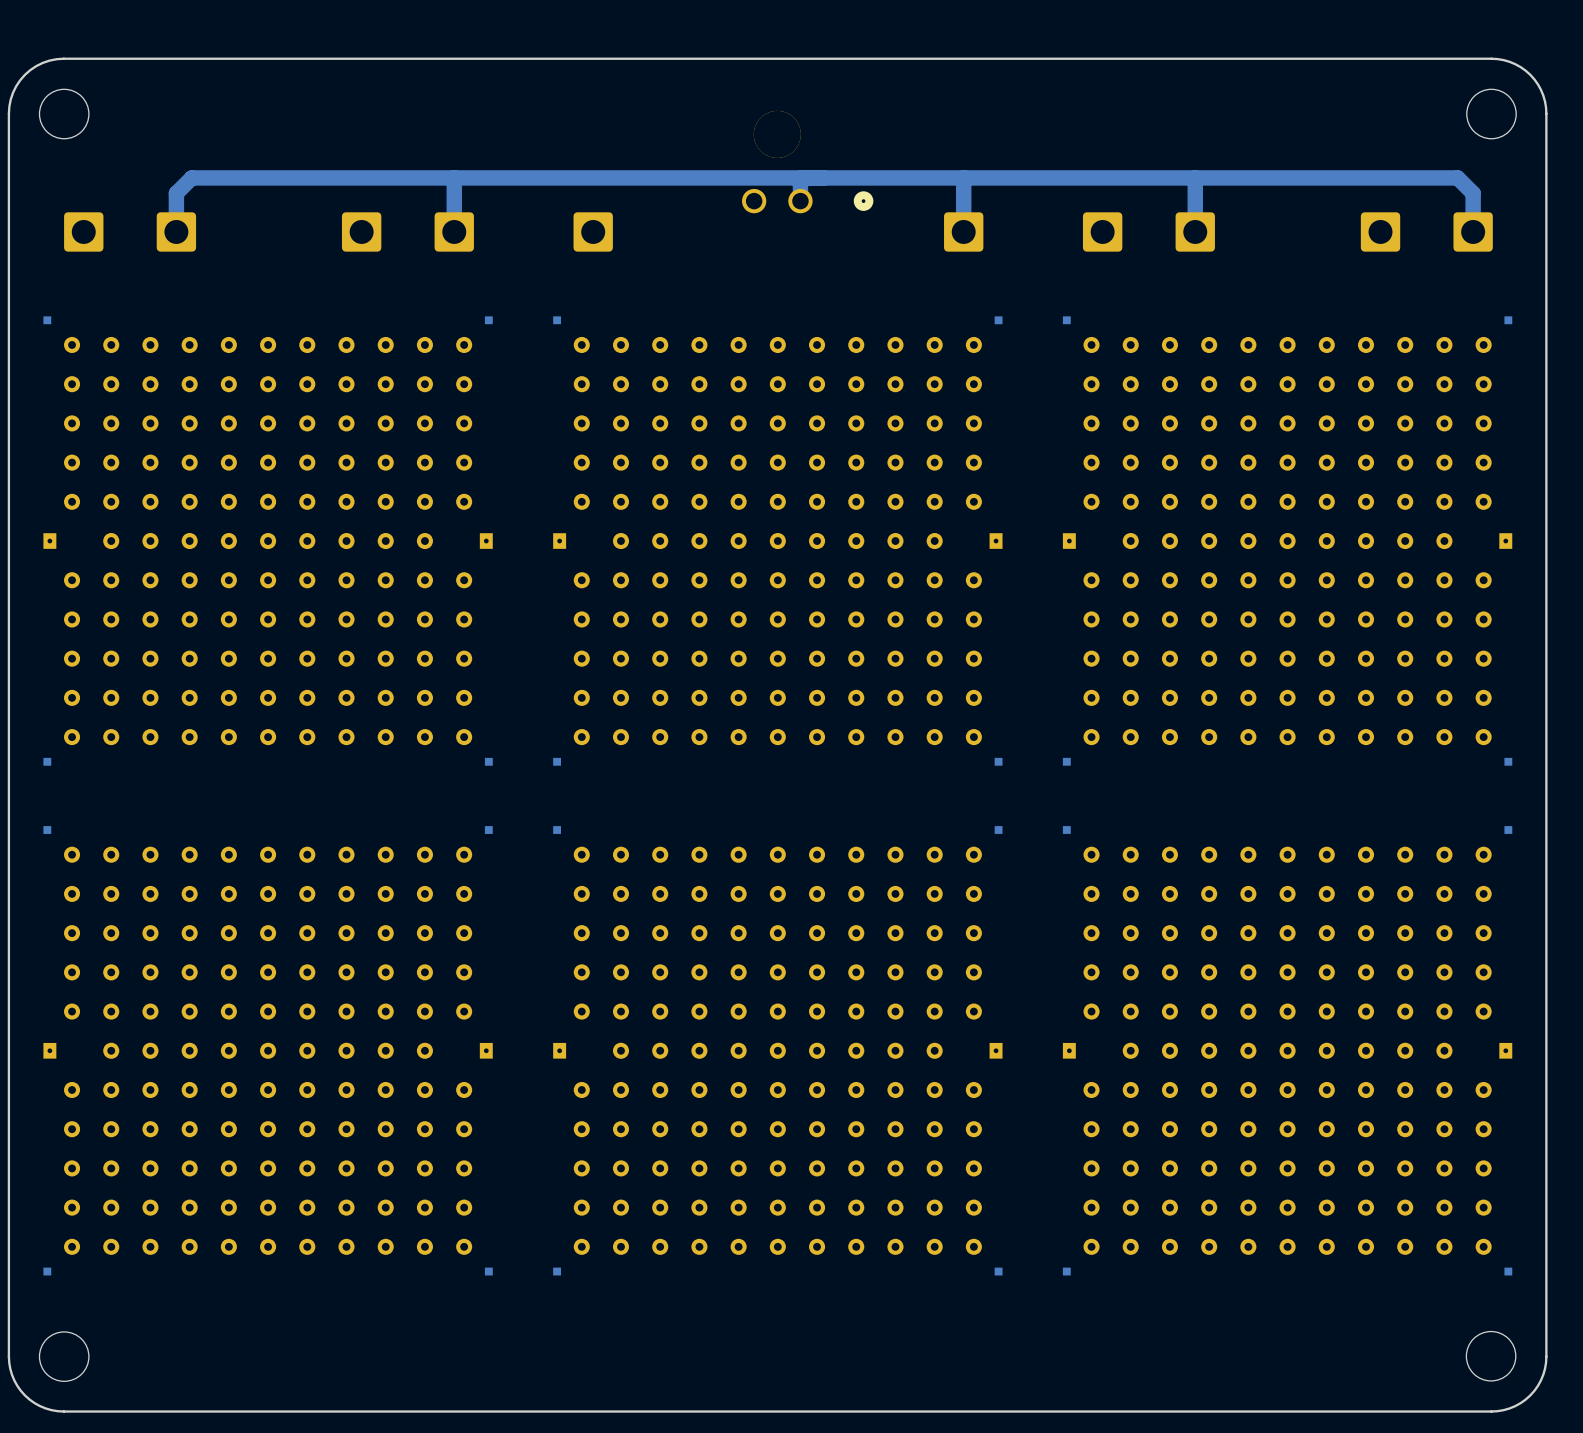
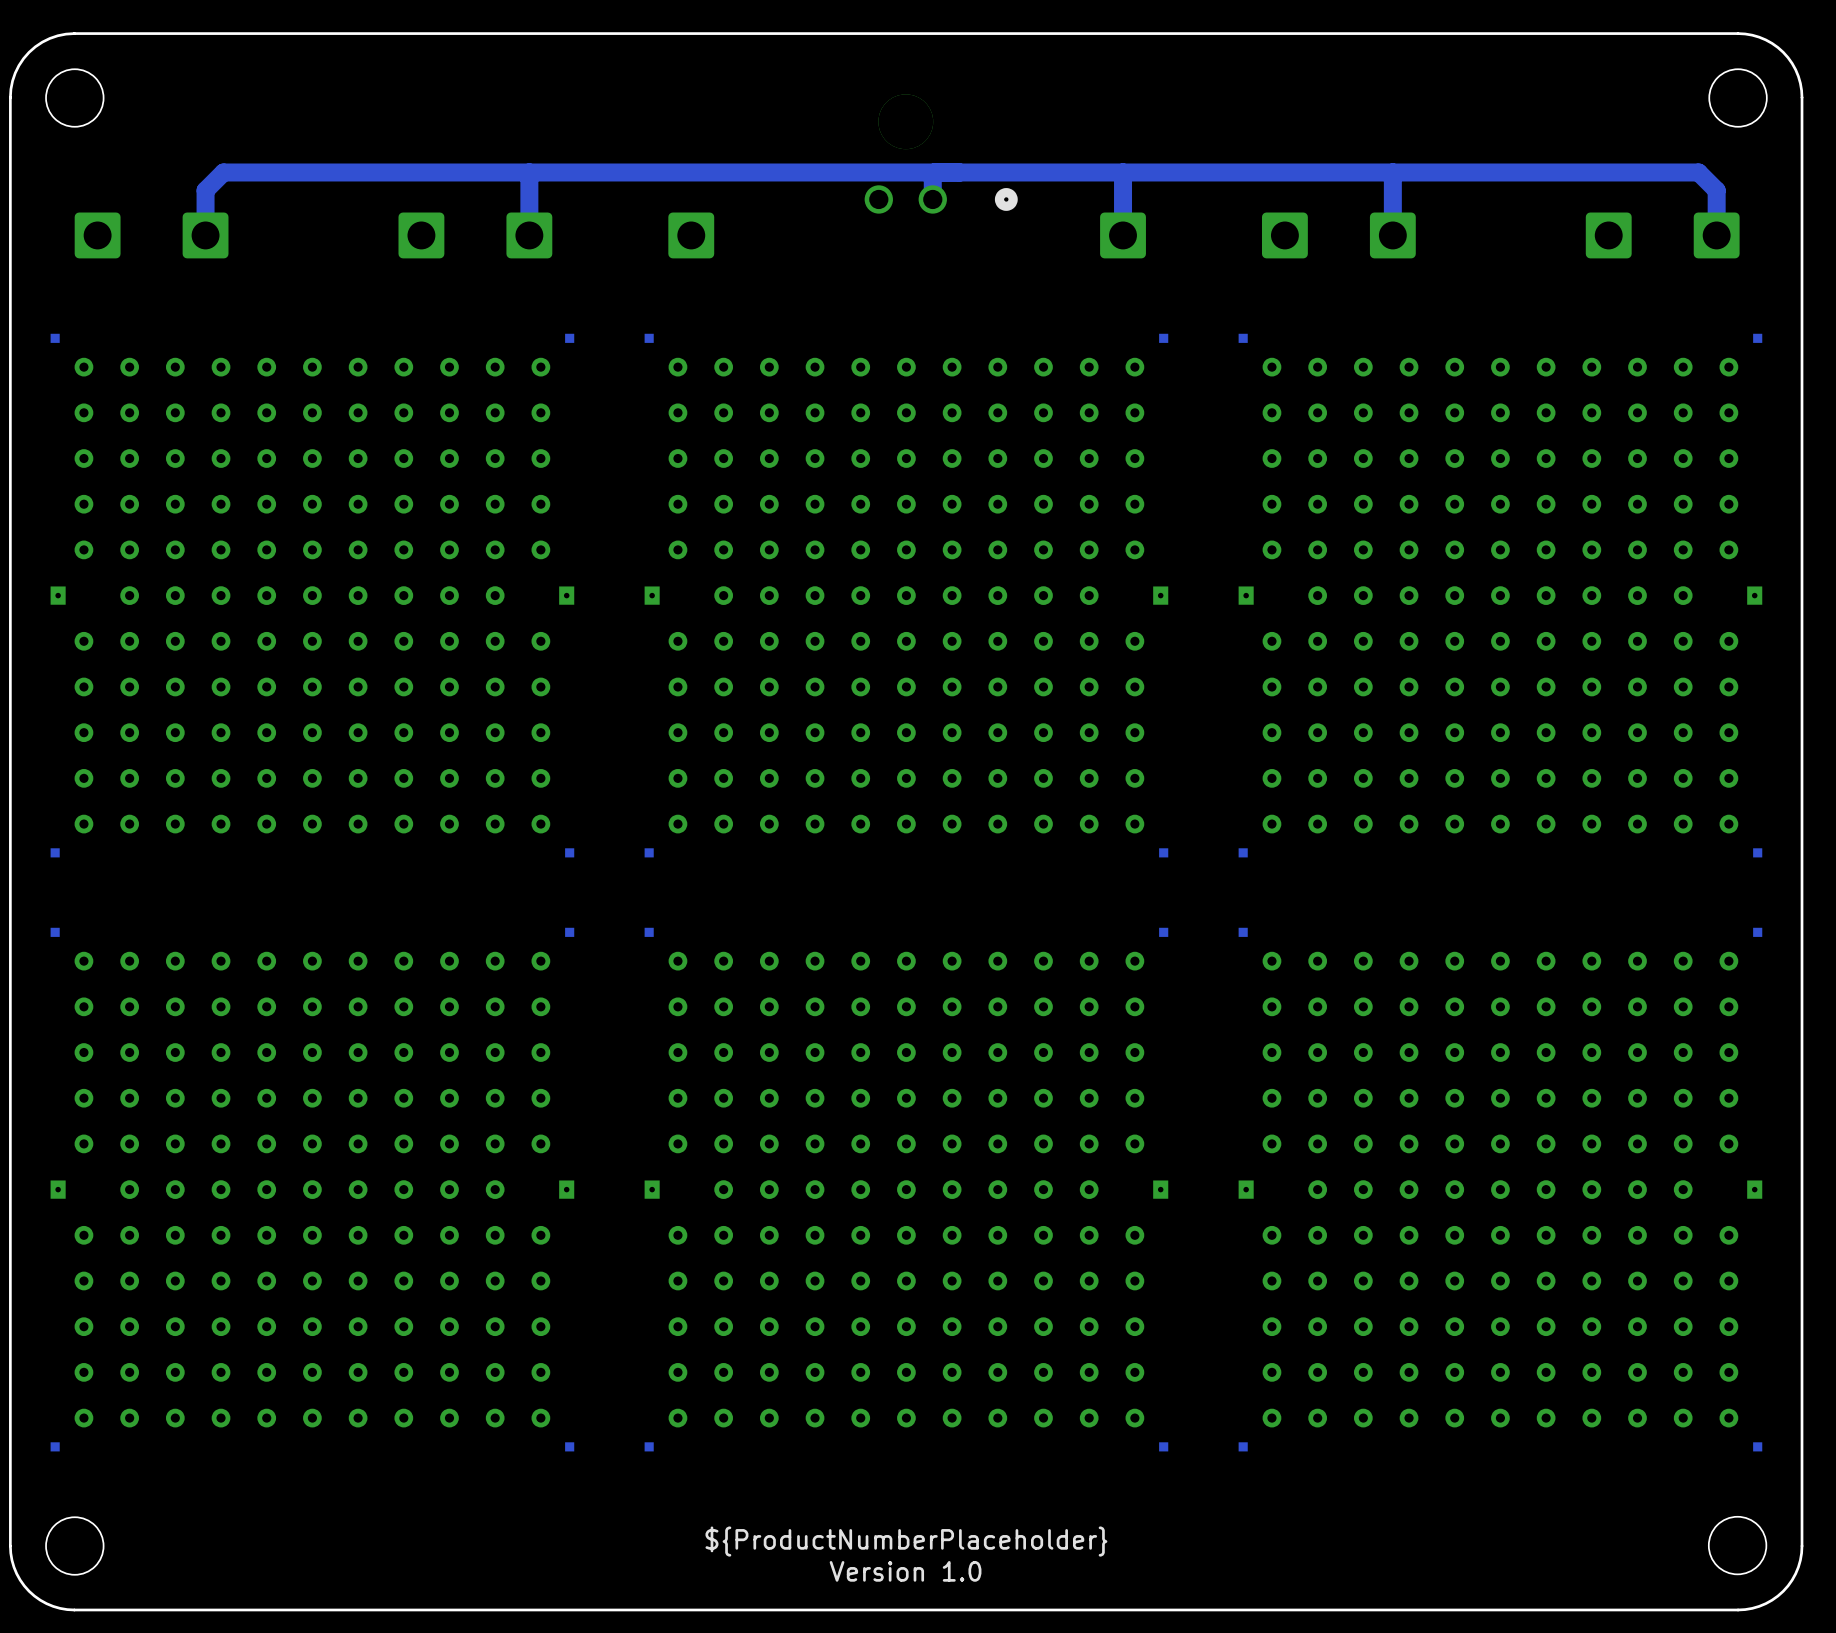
text: none -> ${ProductNumberPlaceholder} (906, 1541)
text: none -> Version 1.0 (905, 1571)

